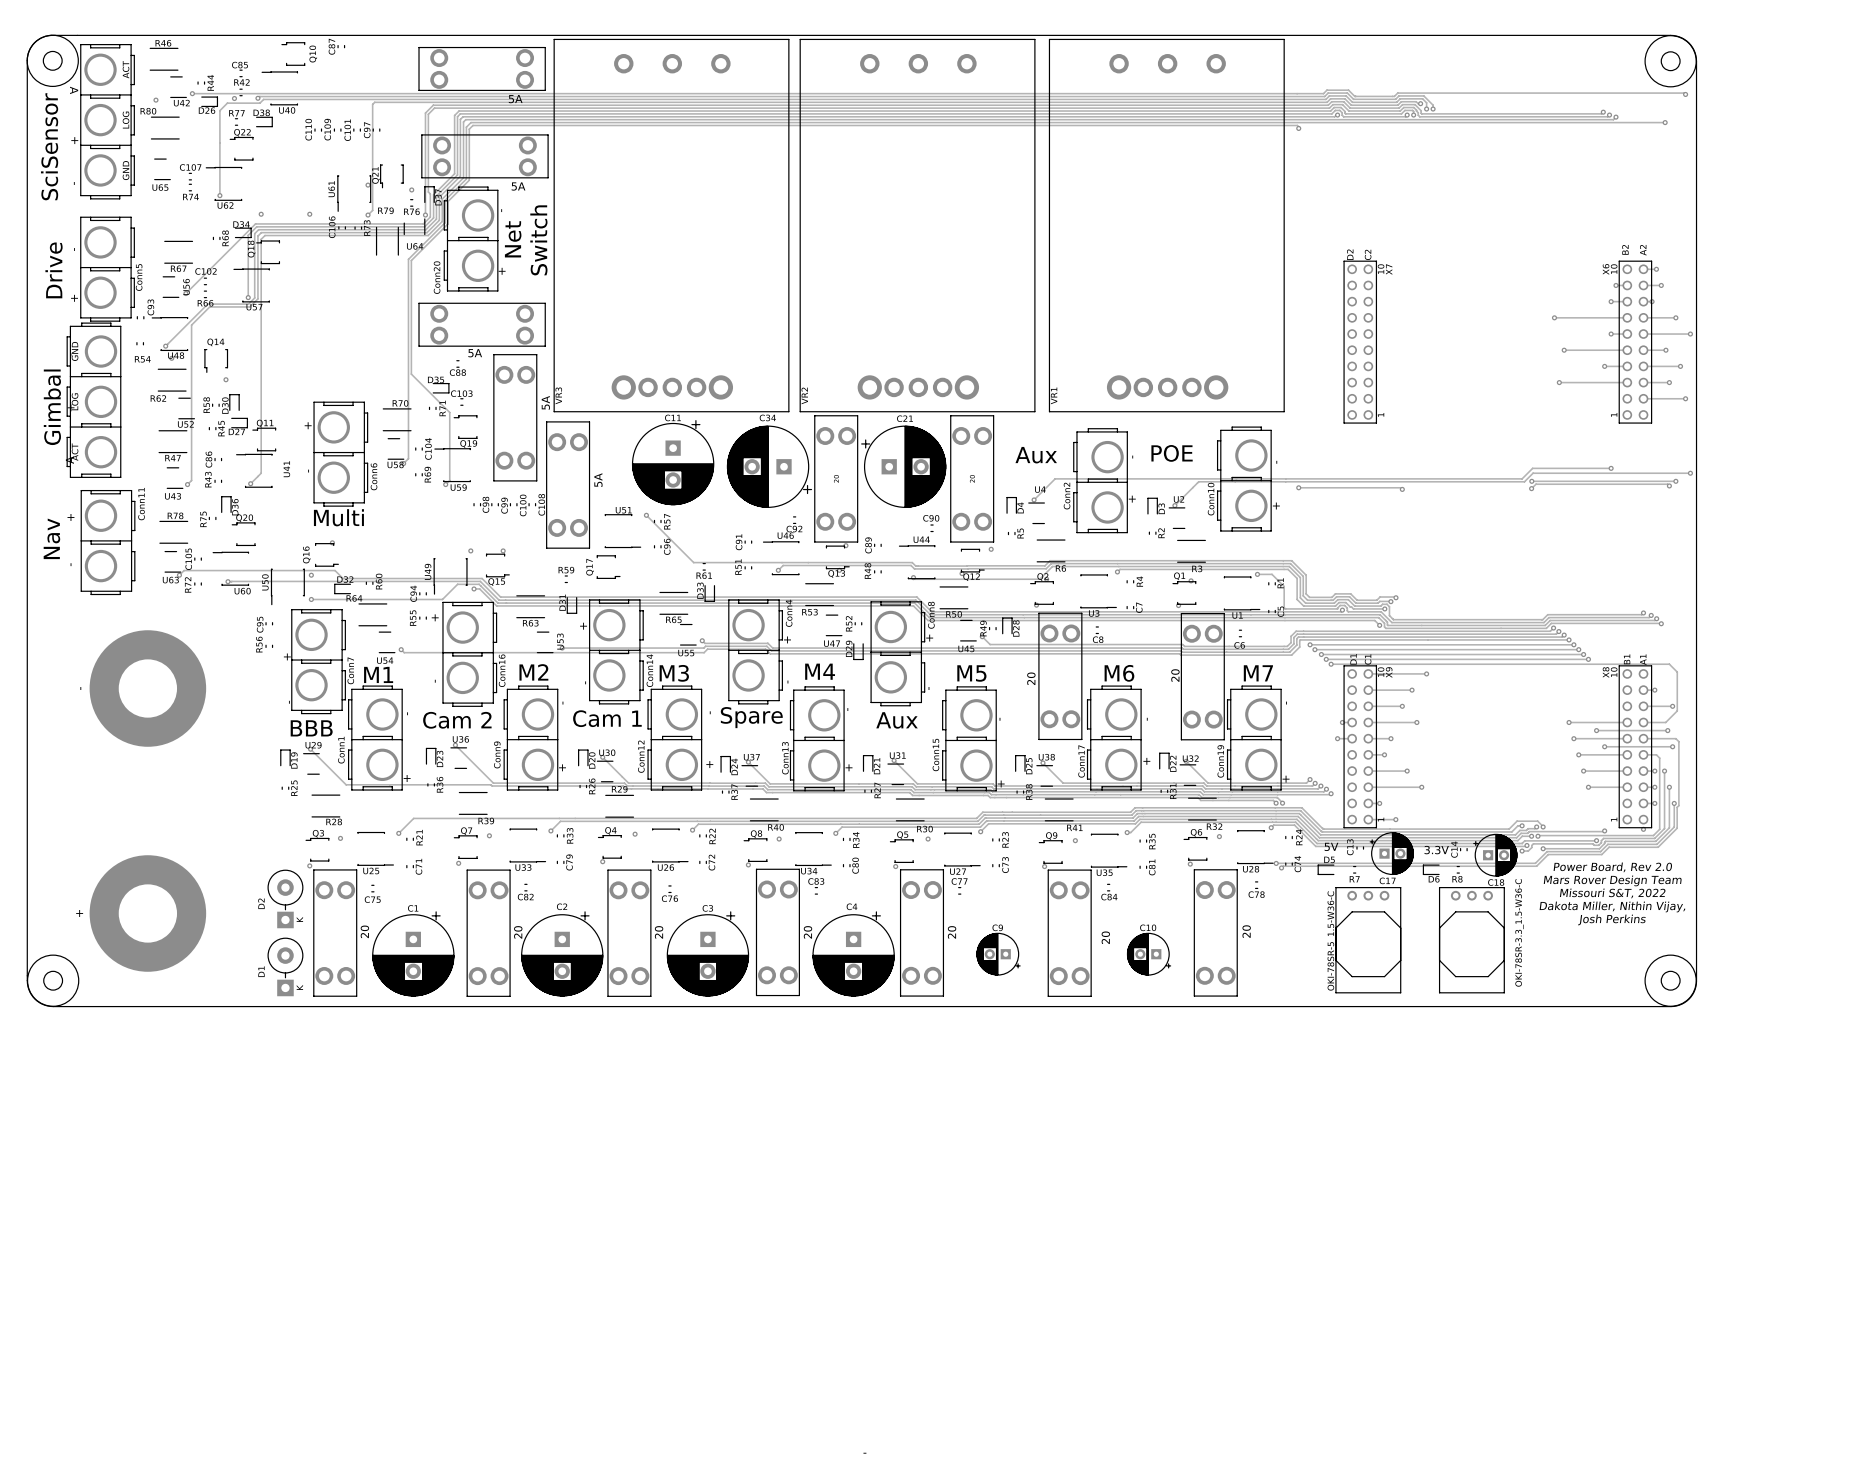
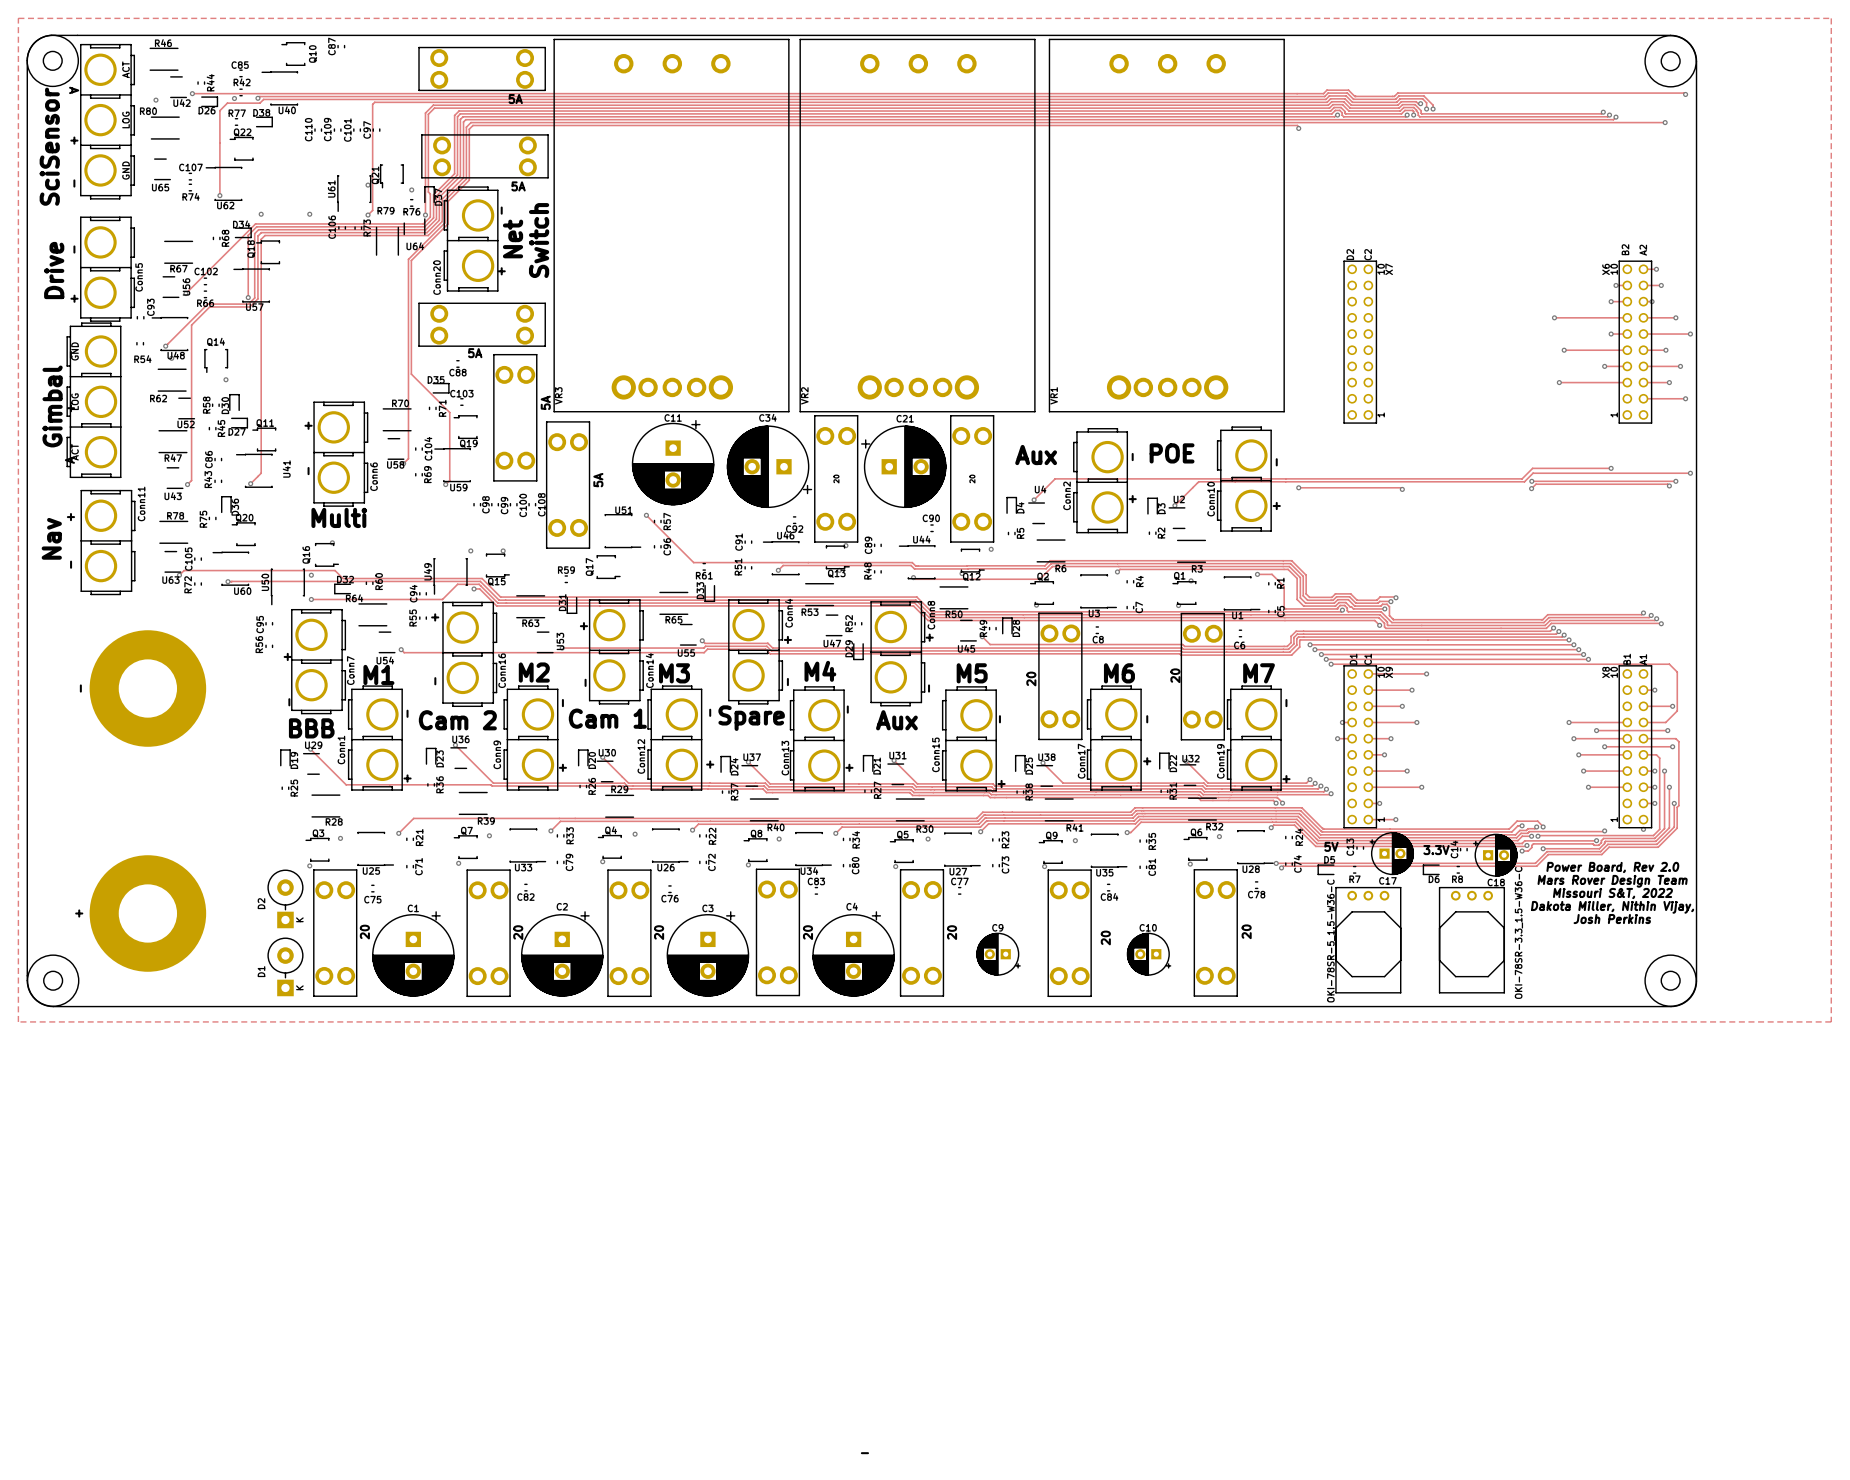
zone outline: none -> (18, 18) (18, 1021) (1831, 1021) (1831, 18) (18, 18)

